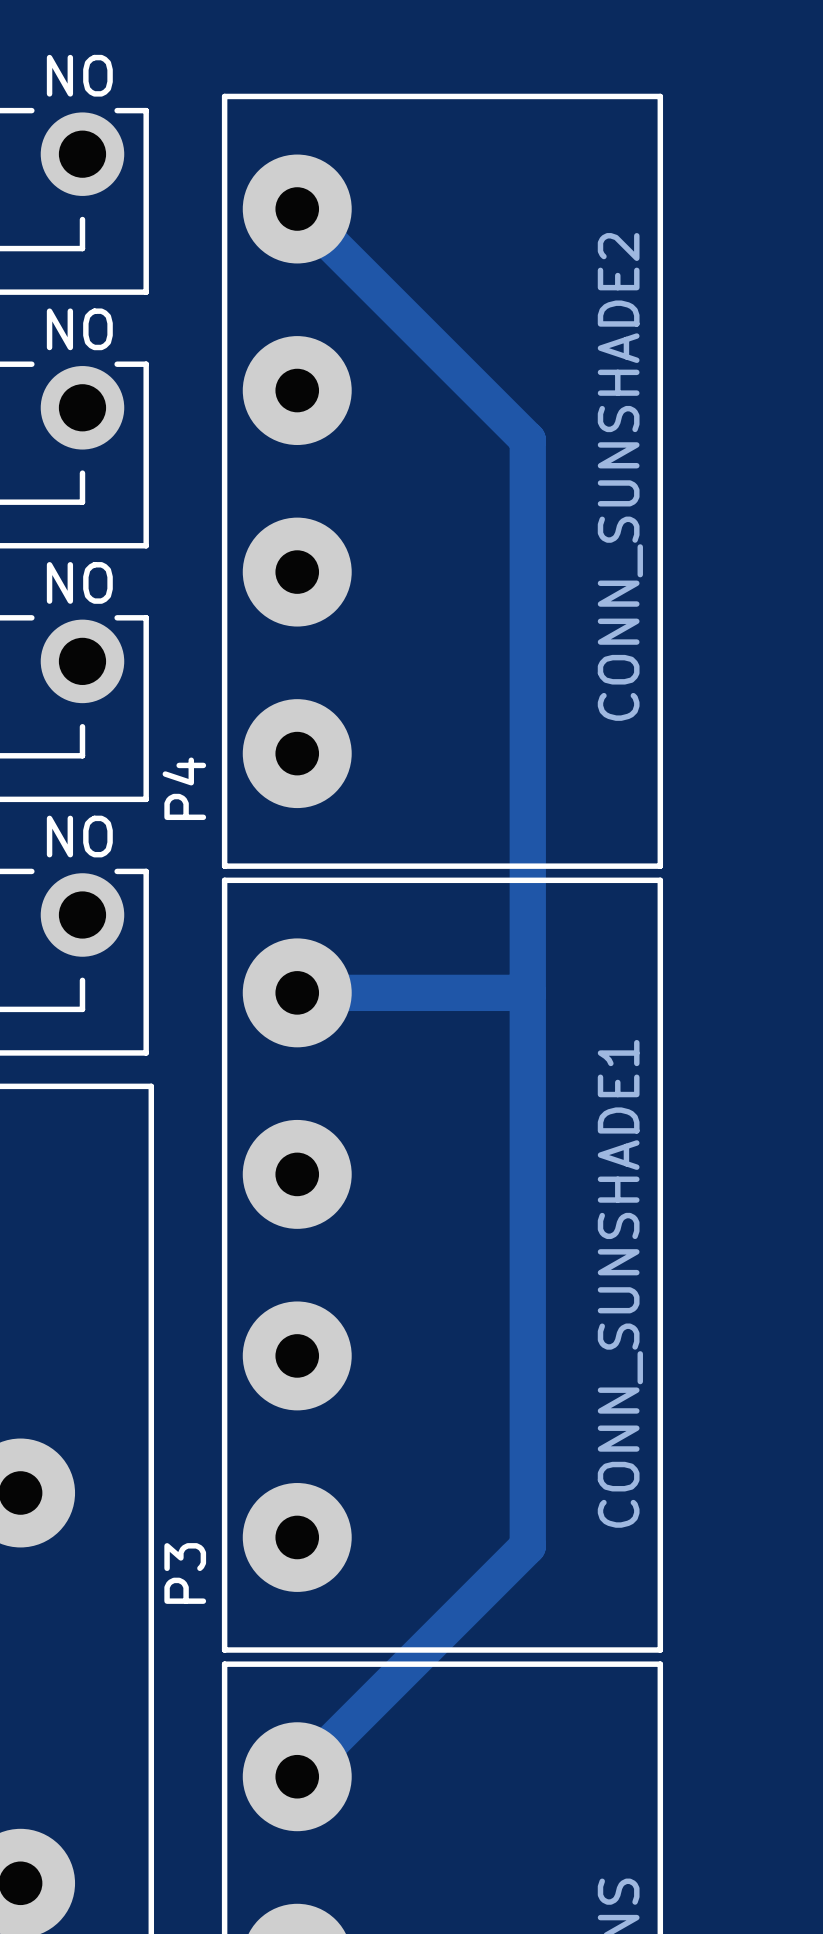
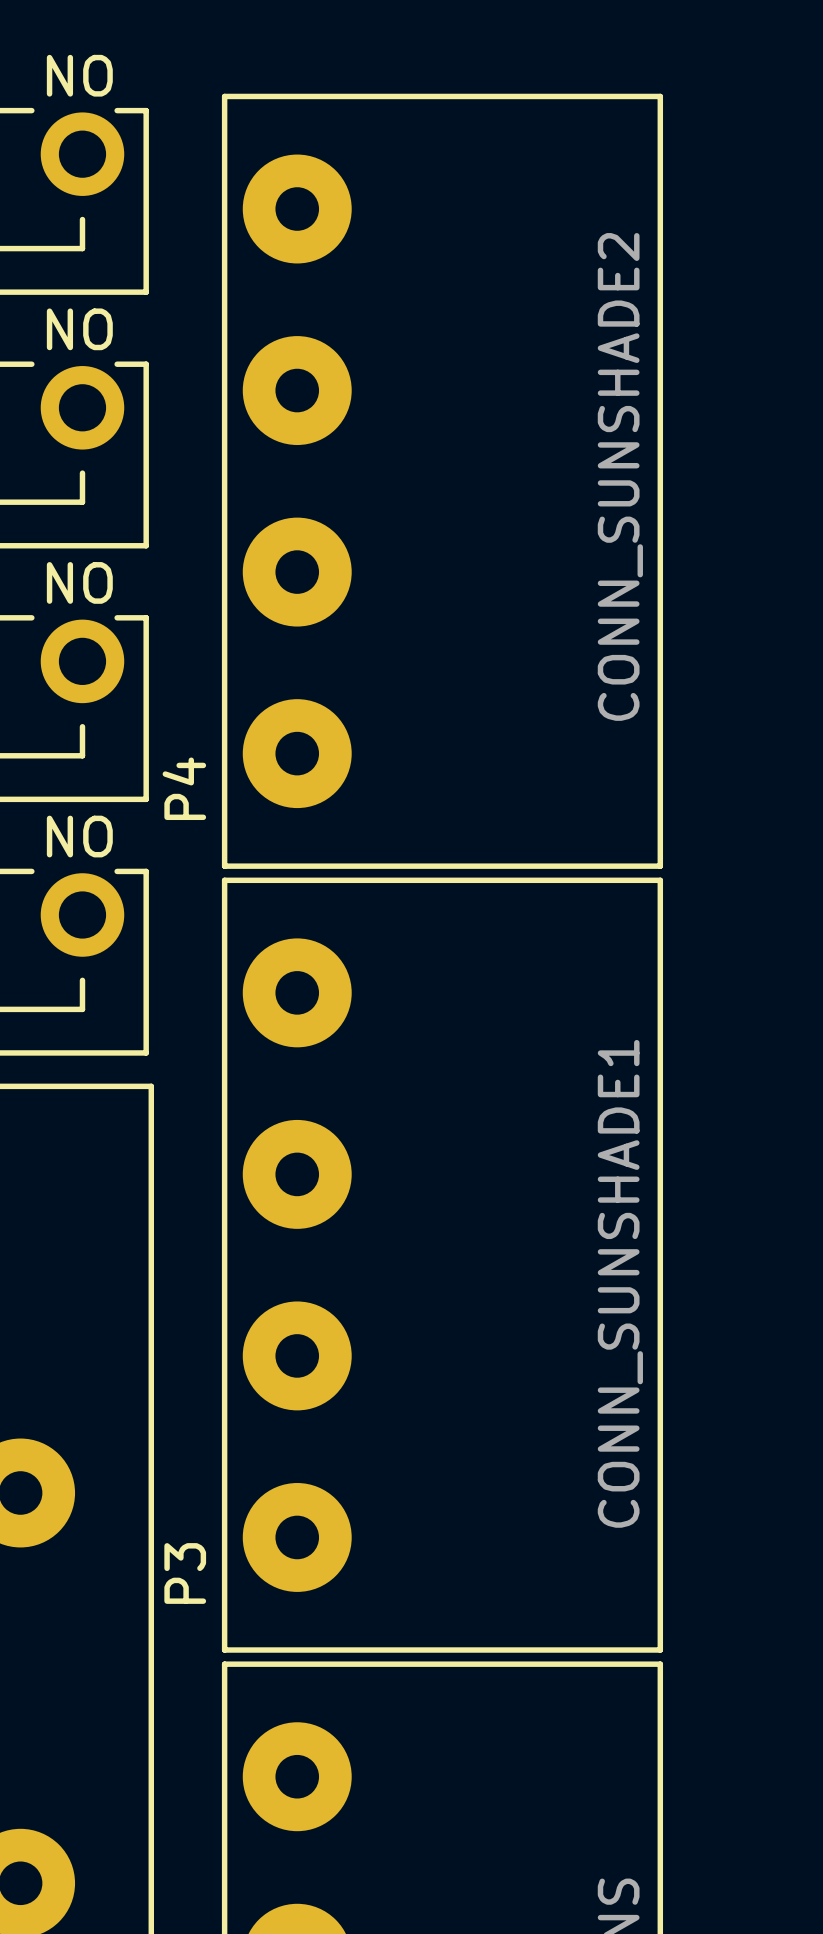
track: (297, 209) (527, 440) (527, 1546) (297, 1776) -> none
track: (297, 992) (527, 992) -> none

